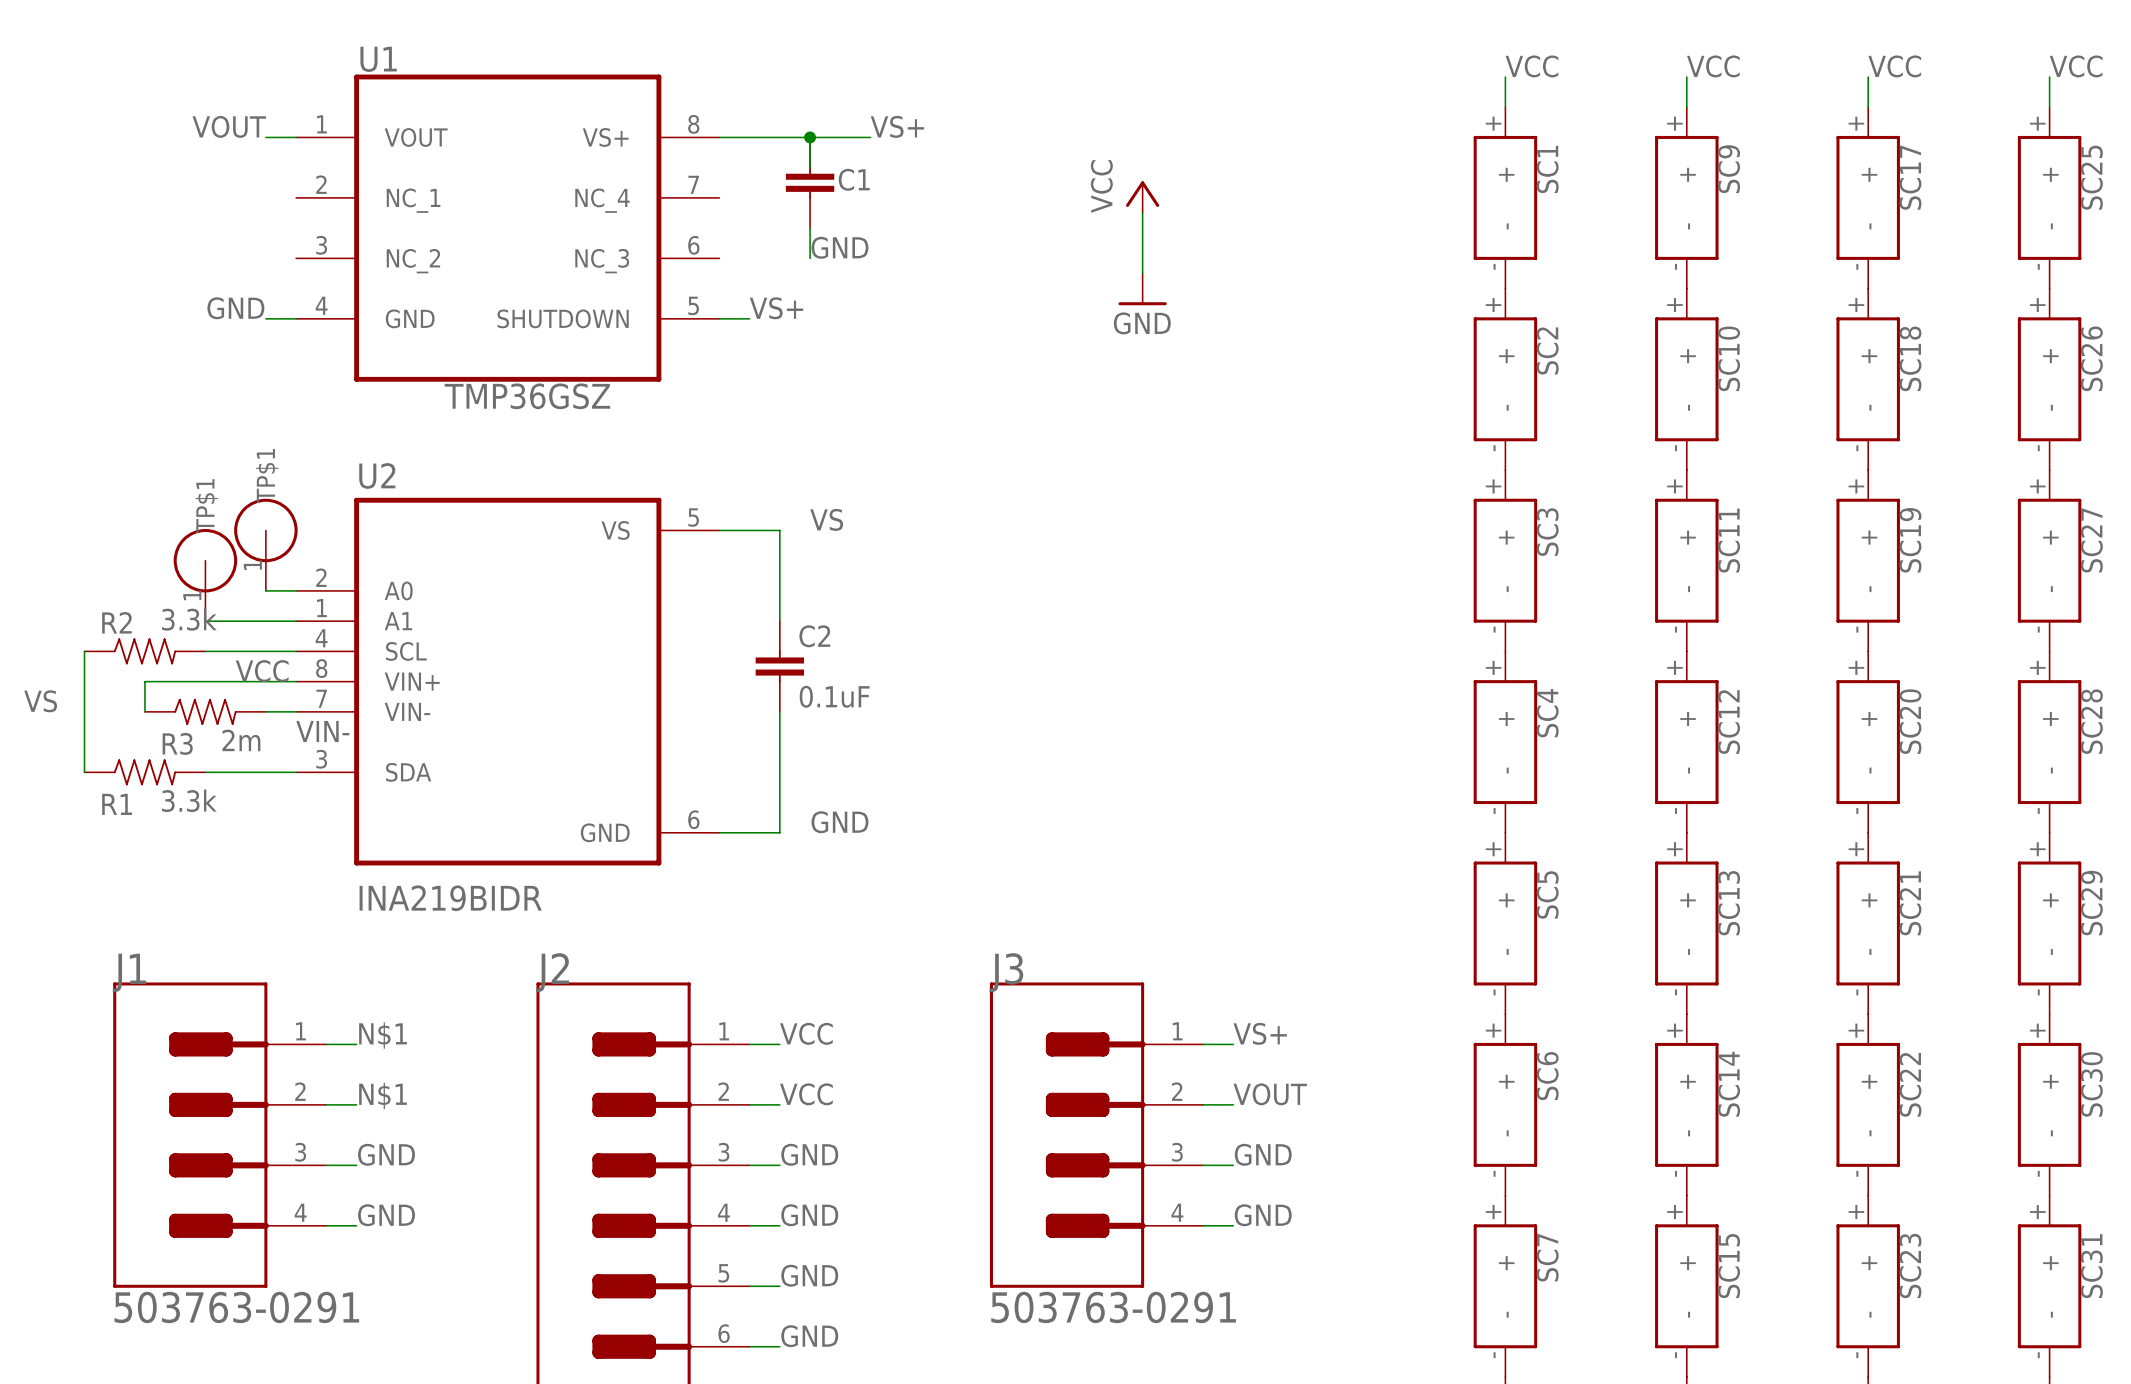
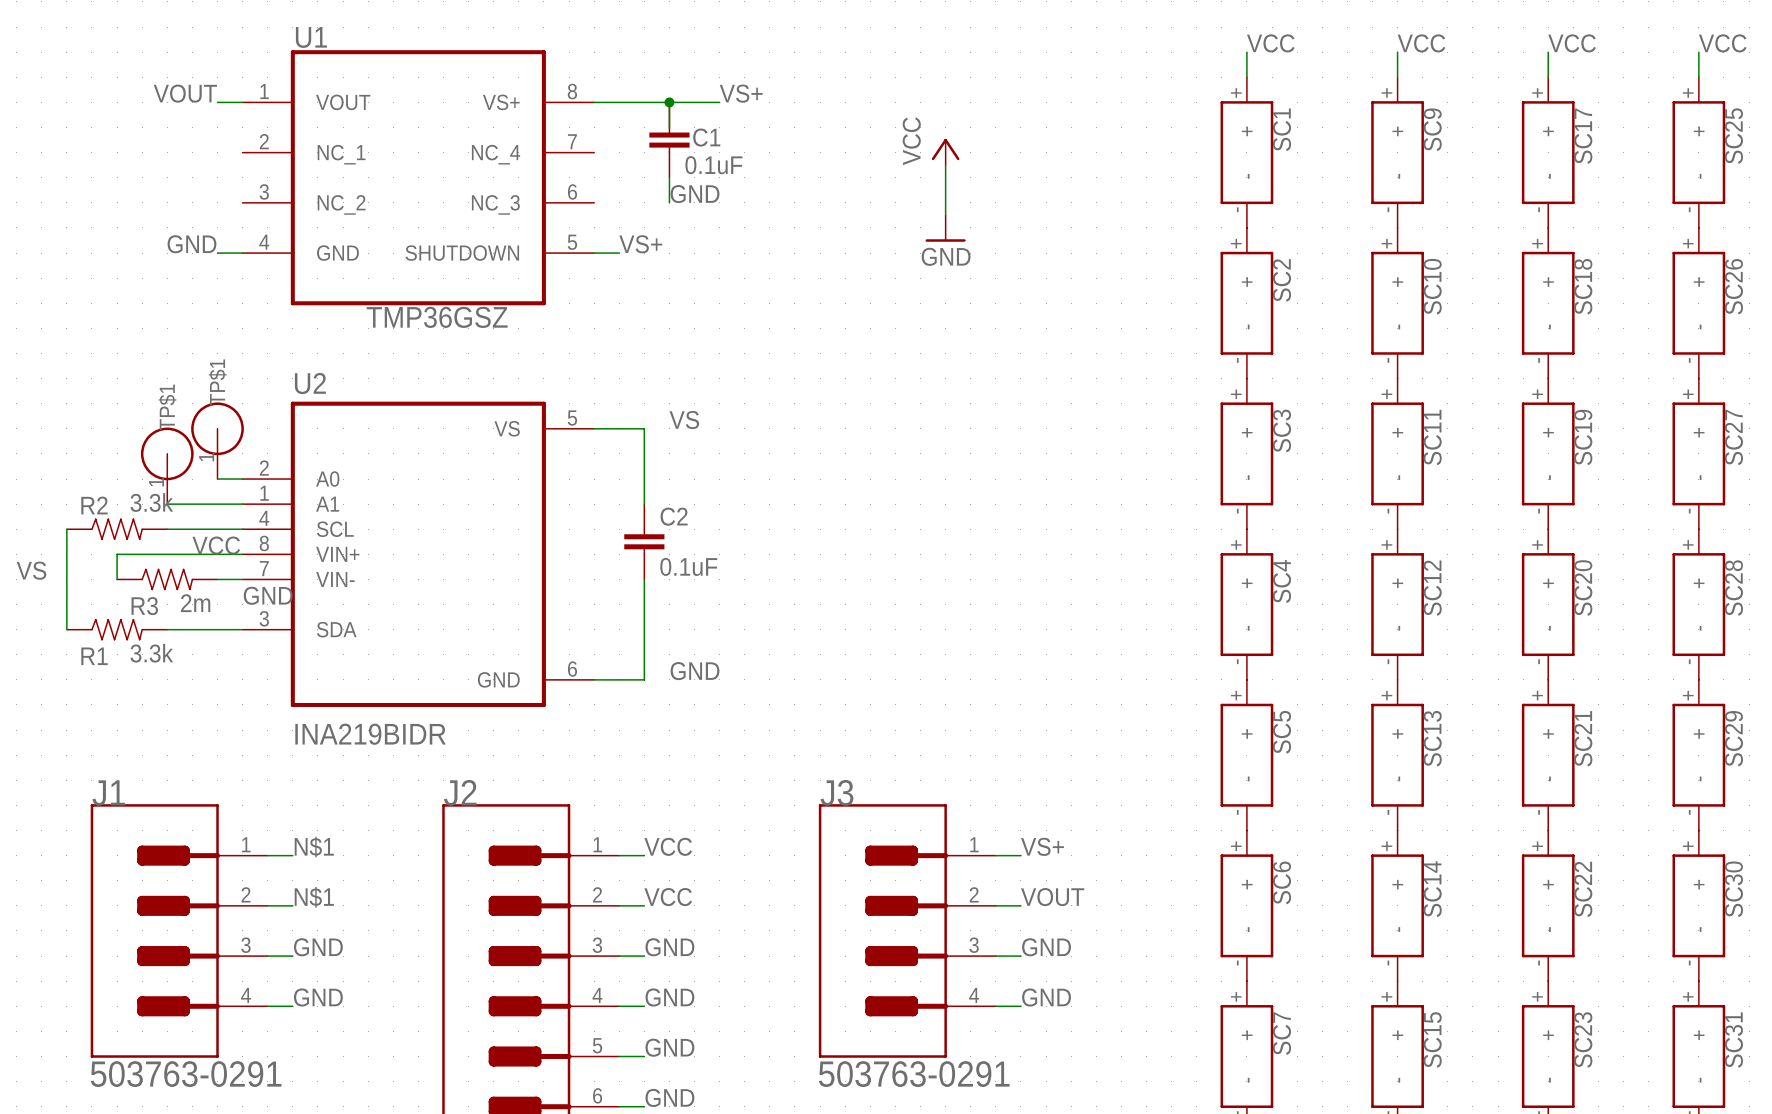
C1 value: none -> 0.1uF (713, 165)
label: VIN- (322, 731) -> GND (268, 595)

